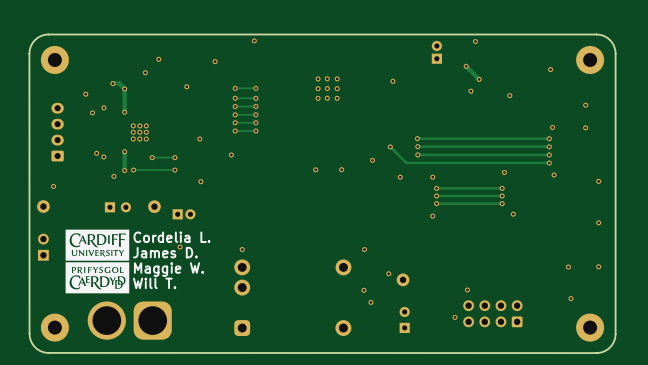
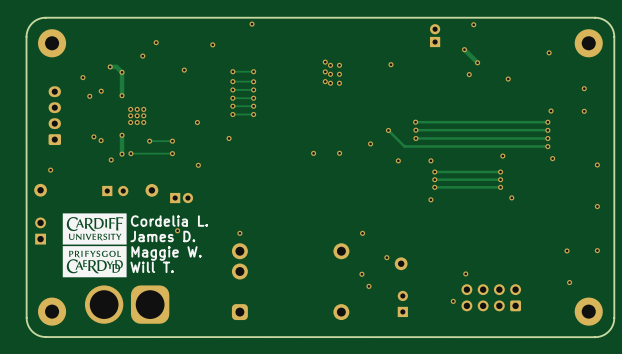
via: (318, 78) -> none
via: (337, 78) -> none
via: none -> (330, 65)
via: none -> (339, 65)
via: (318, 88) -> none
via: (337, 88) -> none
via: none -> (330, 74)
via: none -> (339, 74)
via: (318, 98) -> none
via: (337, 98) -> none
via: none -> (330, 83)
via: none -> (339, 83)

